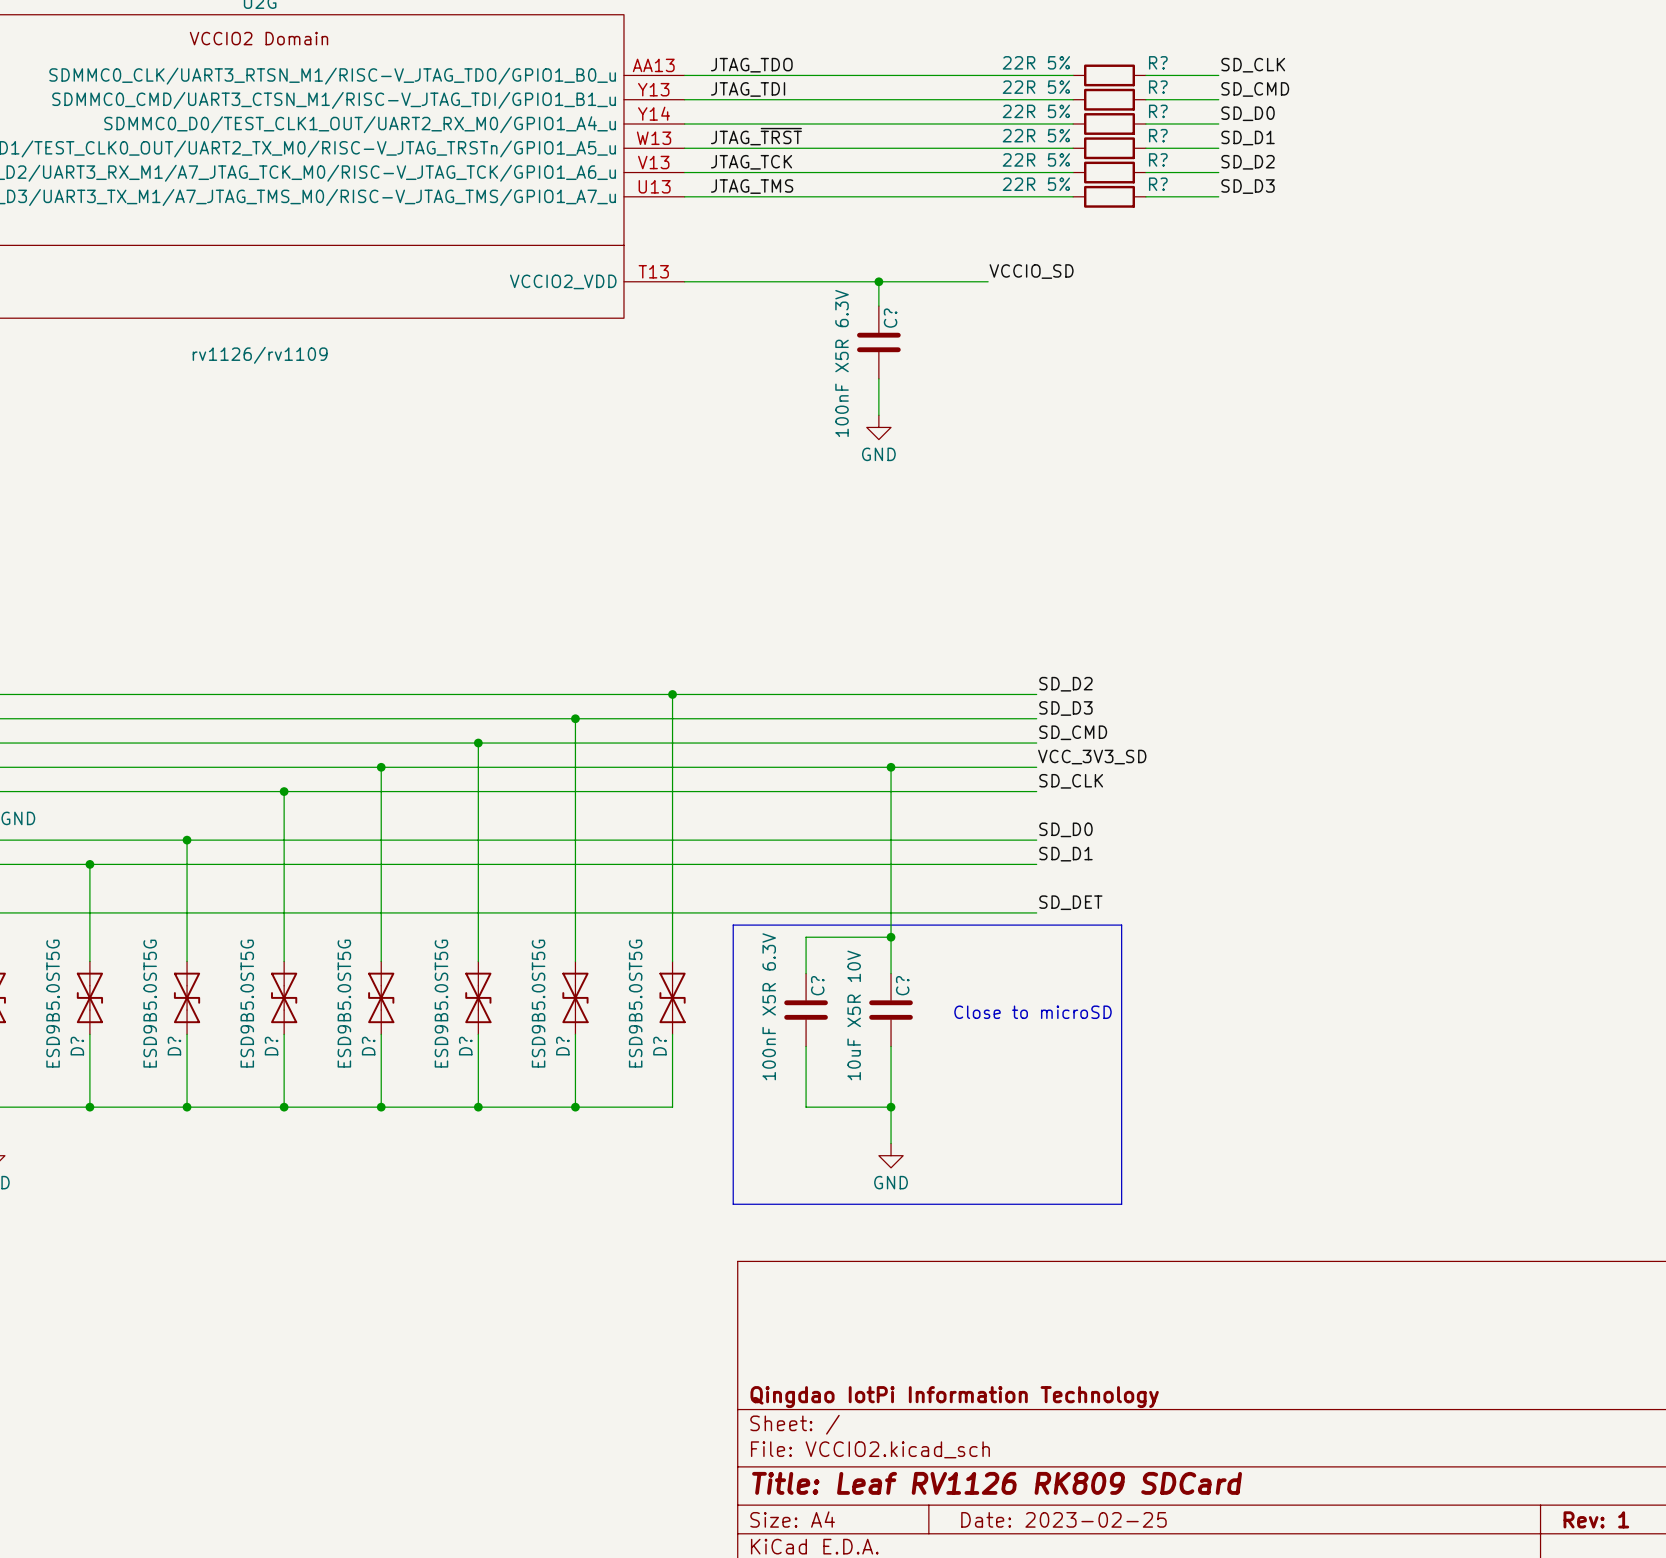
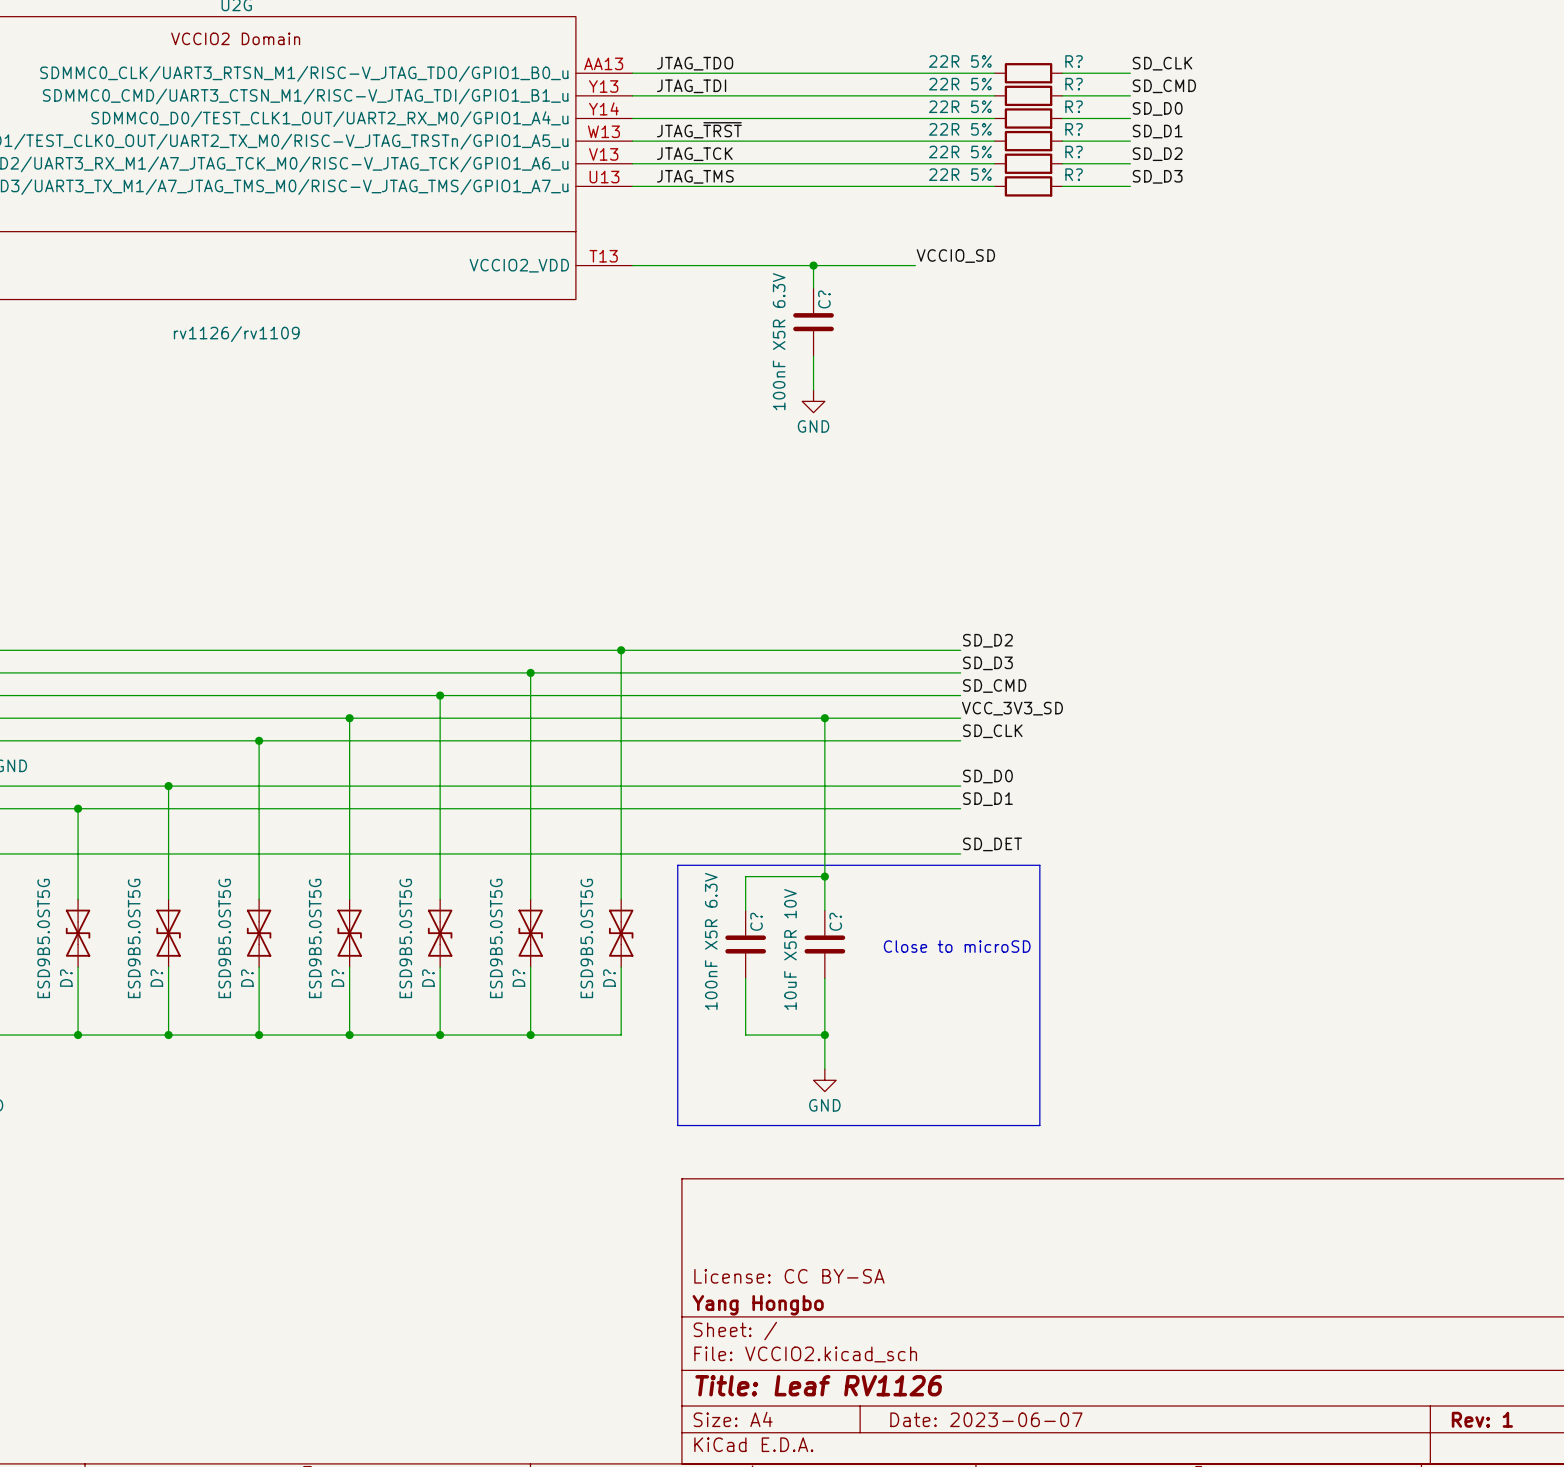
title block: none -> License: CC BY-SA (789, 1276)
title block: Qingdao IotPi Information Technology (954, 1397) -> Yang Hongbo (758, 1305)
title block: Title: Leaf RV1126 RK809 SDCard (997, 1483) -> Title: Leaf RV1126 (818, 1385)
title block: Date: 2023-02-25 (1063, 1519) -> Date: 2023-06-07 (986, 1419)

